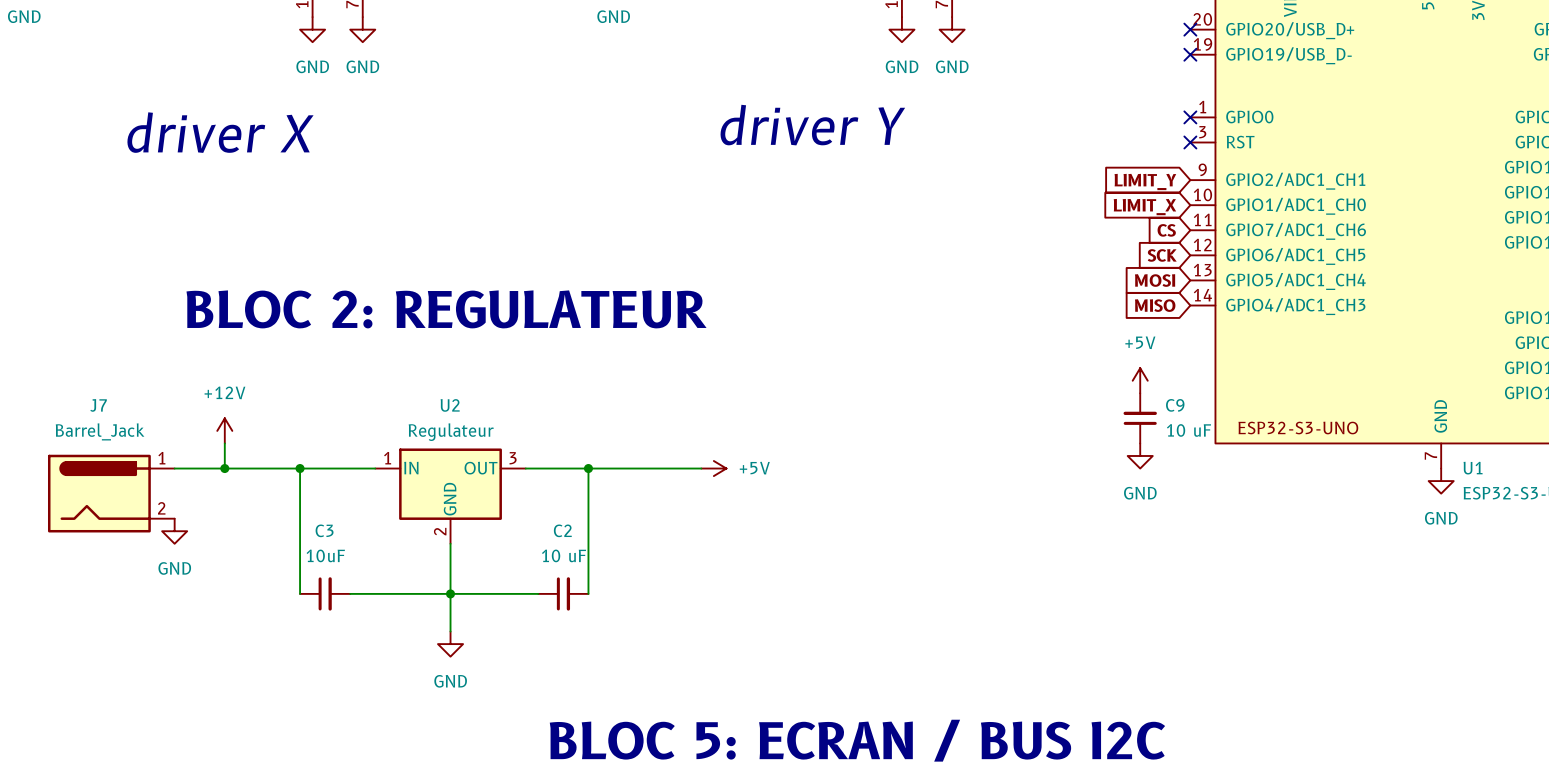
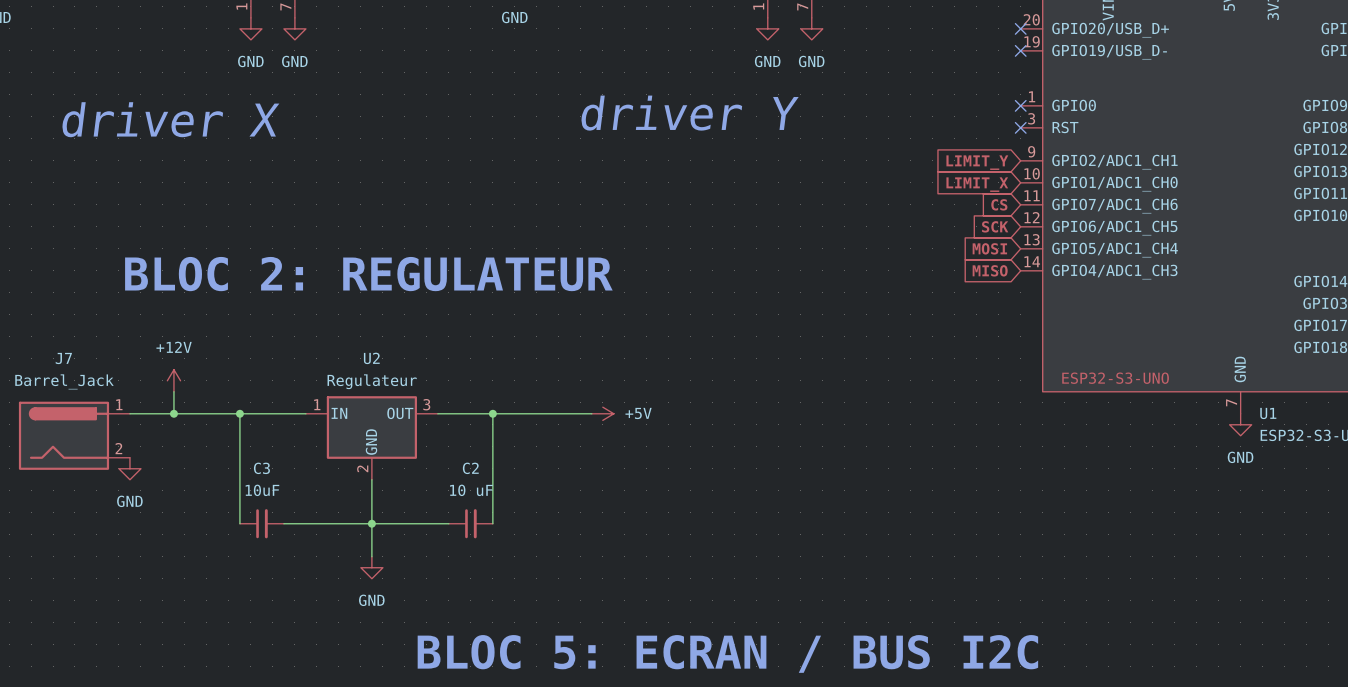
power symbol: +5V (1140, 380) -> none
C9: 10 uF (1140, 418) -> none
power symbol: GND (1140, 455) -> none

